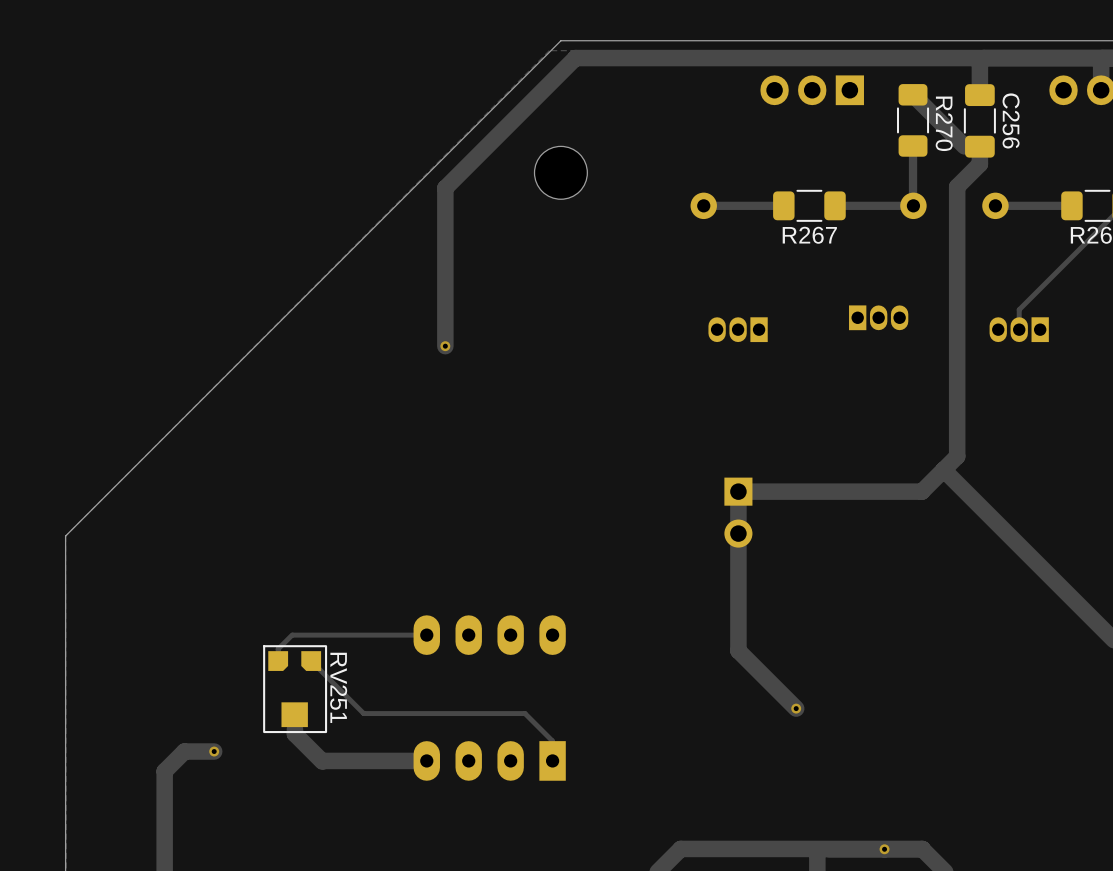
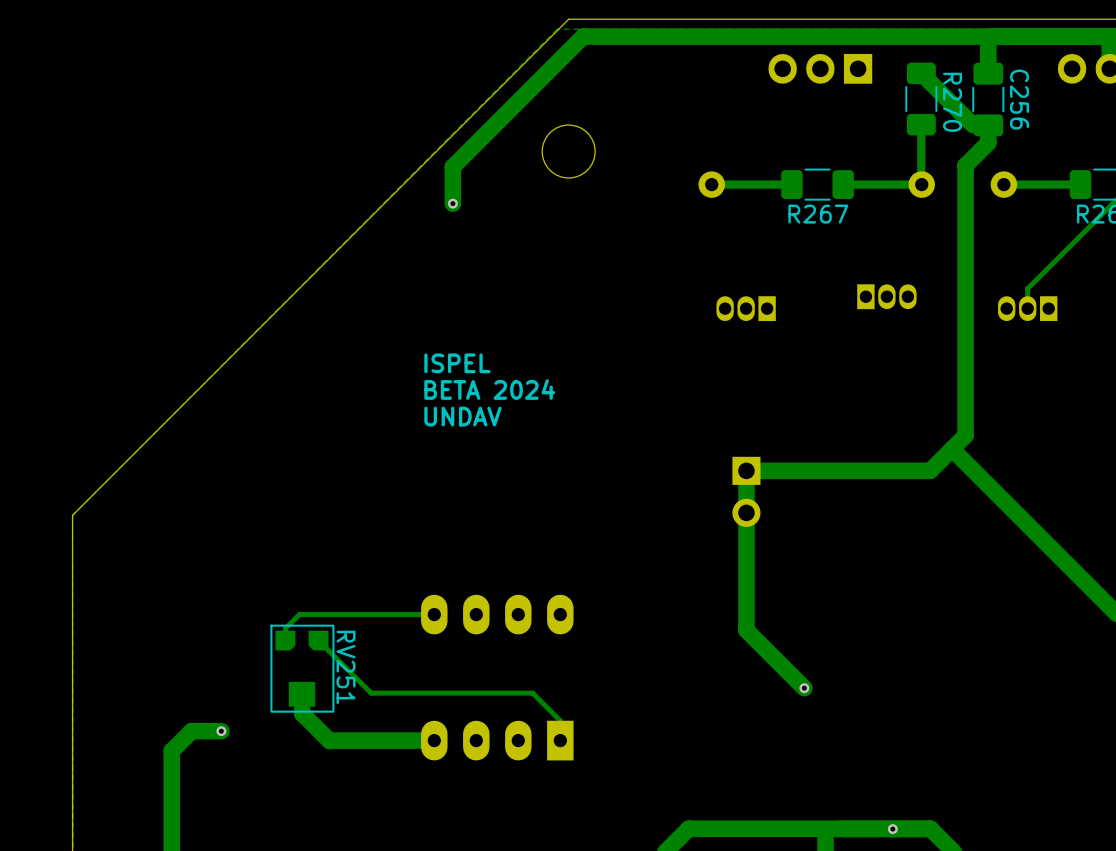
track: (445, 224) (445, 346) -> none
via: none -> (452, 203)
via: (445, 346) -> none
text: none -> ISPEL (457, 363)
text: none -> BETA 2024 (489, 389)
text: none -> UNDAV (462, 416)

